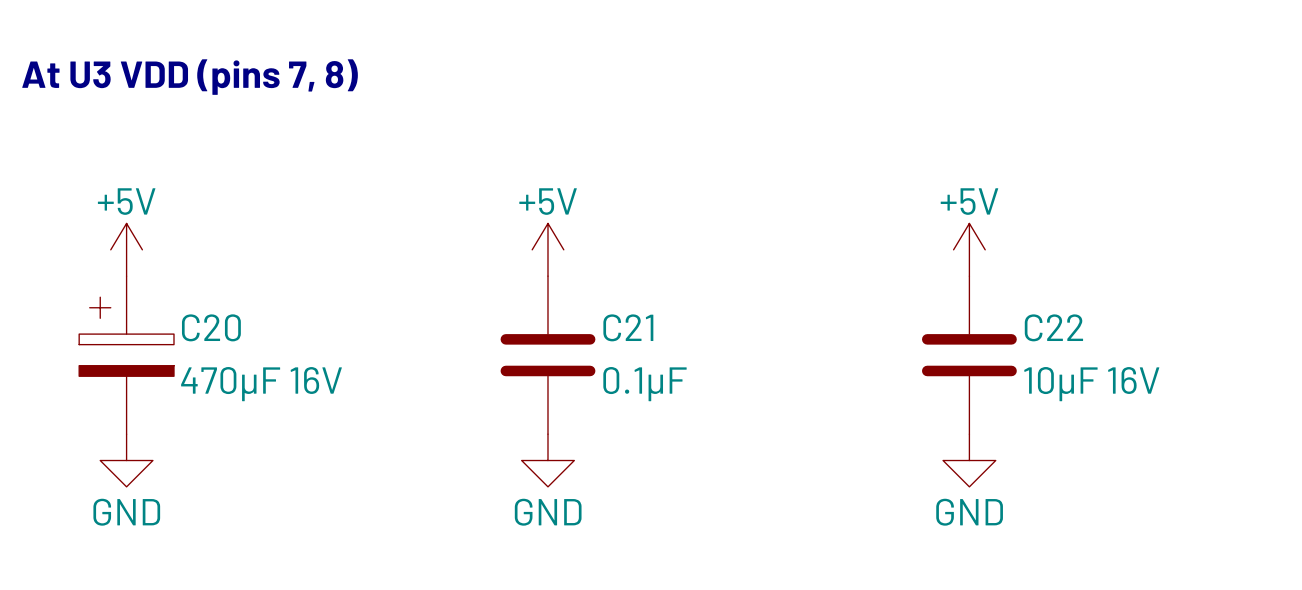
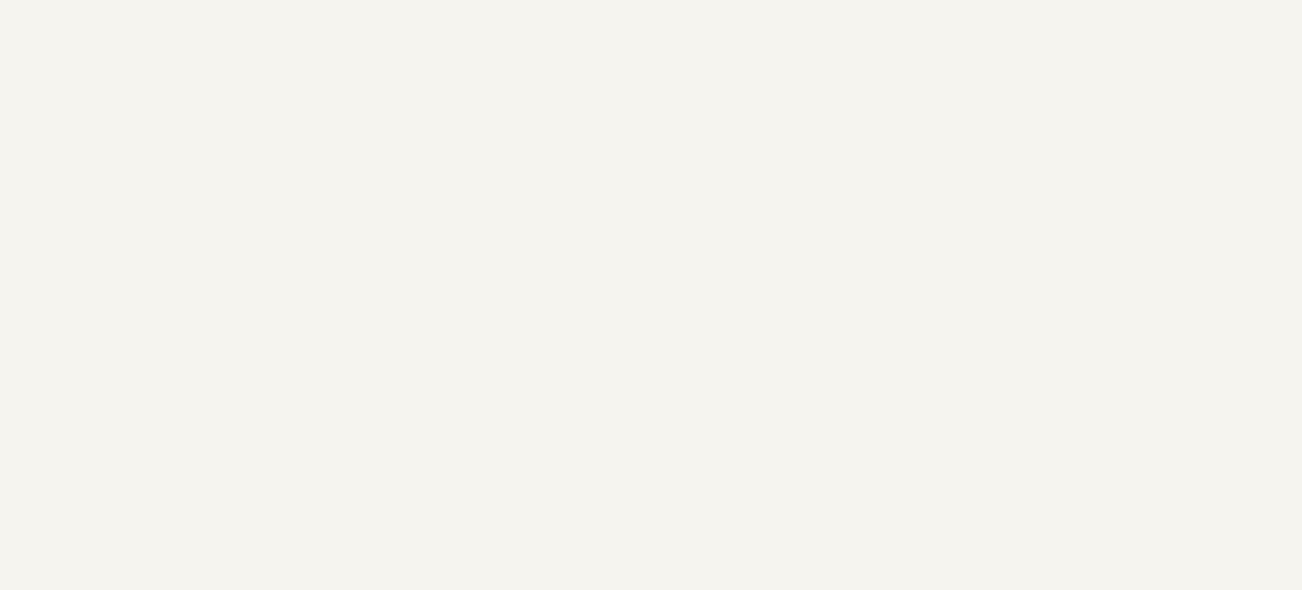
text: At U3 VDD (pins 7, 8) (190, 77) -> none
power symbol: +5V (126, 249) -> none
power symbol: +5V (547, 249) -> none
power symbol: +5V (969, 249) -> none
C20: 470µF 16V (126, 355) -> none
C21: 0.1µF (547, 355) -> none
C22: 10µF 16V (969, 355) -> none
power symbol: GND (126, 460) -> none
power symbol: GND (547, 460) -> none
power symbol: GND (969, 460) -> none

